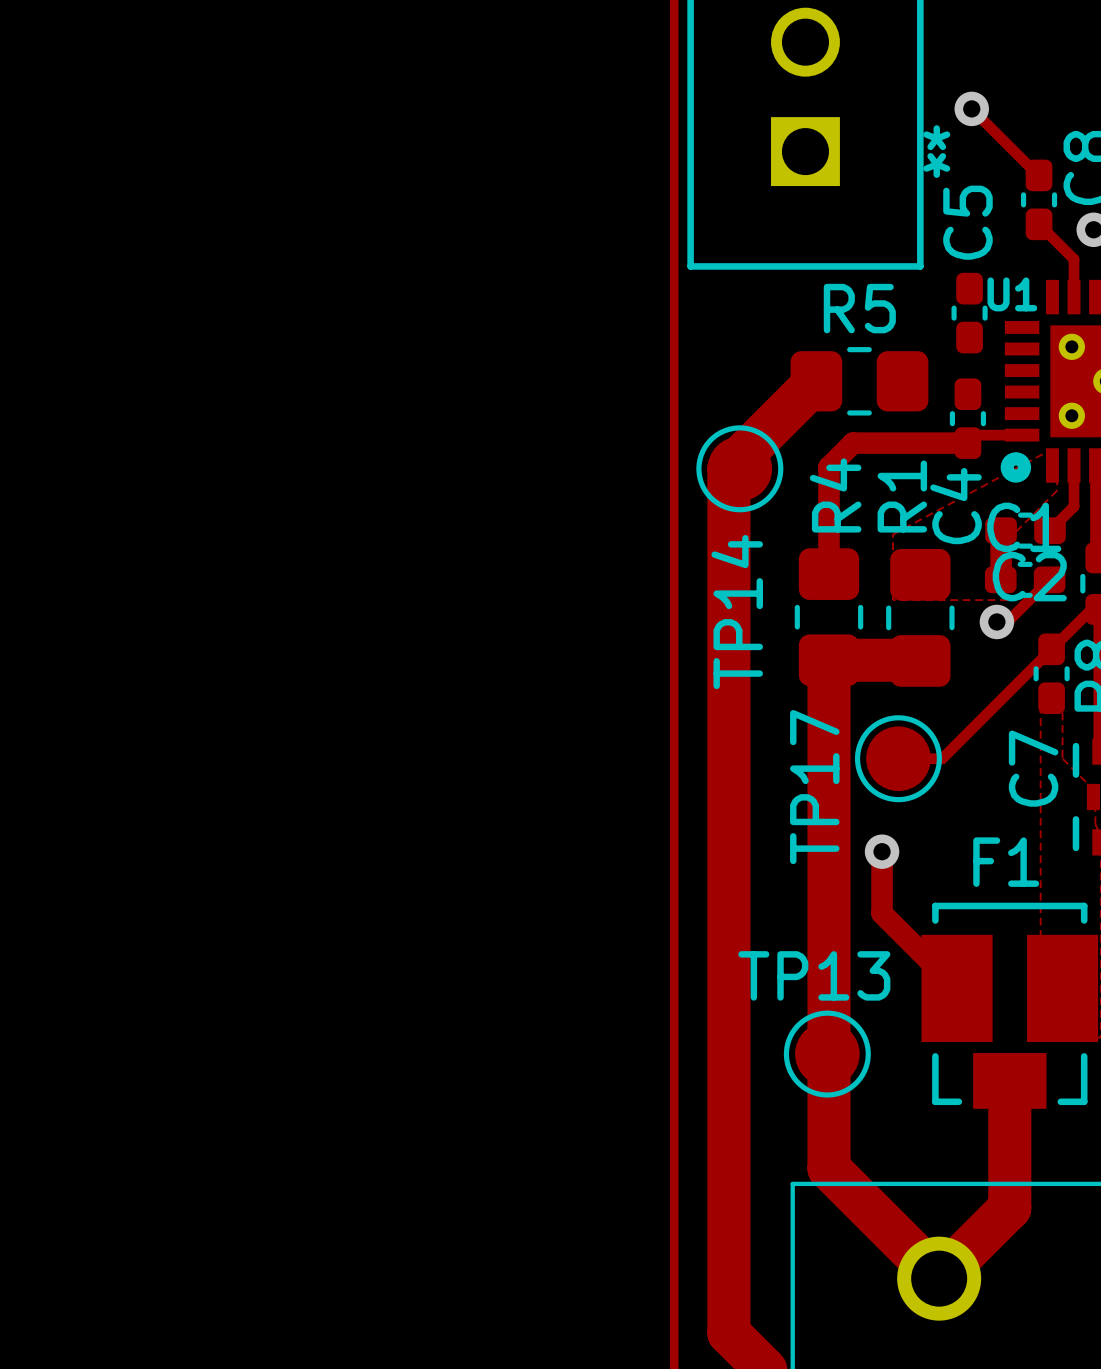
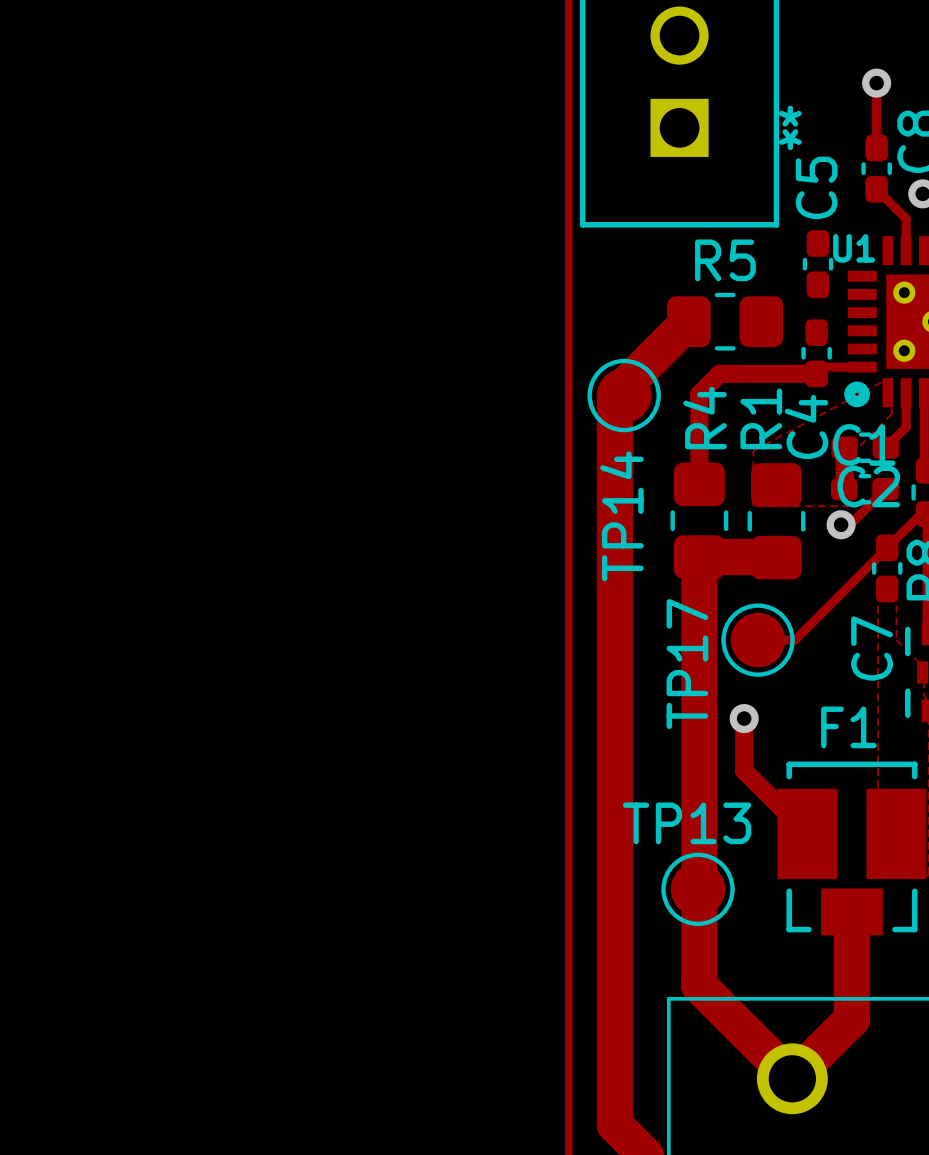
track: (971, 108) (1038, 175) -> (876, 83) (876, 148)
via position: (971, 108) -> (876, 83)

